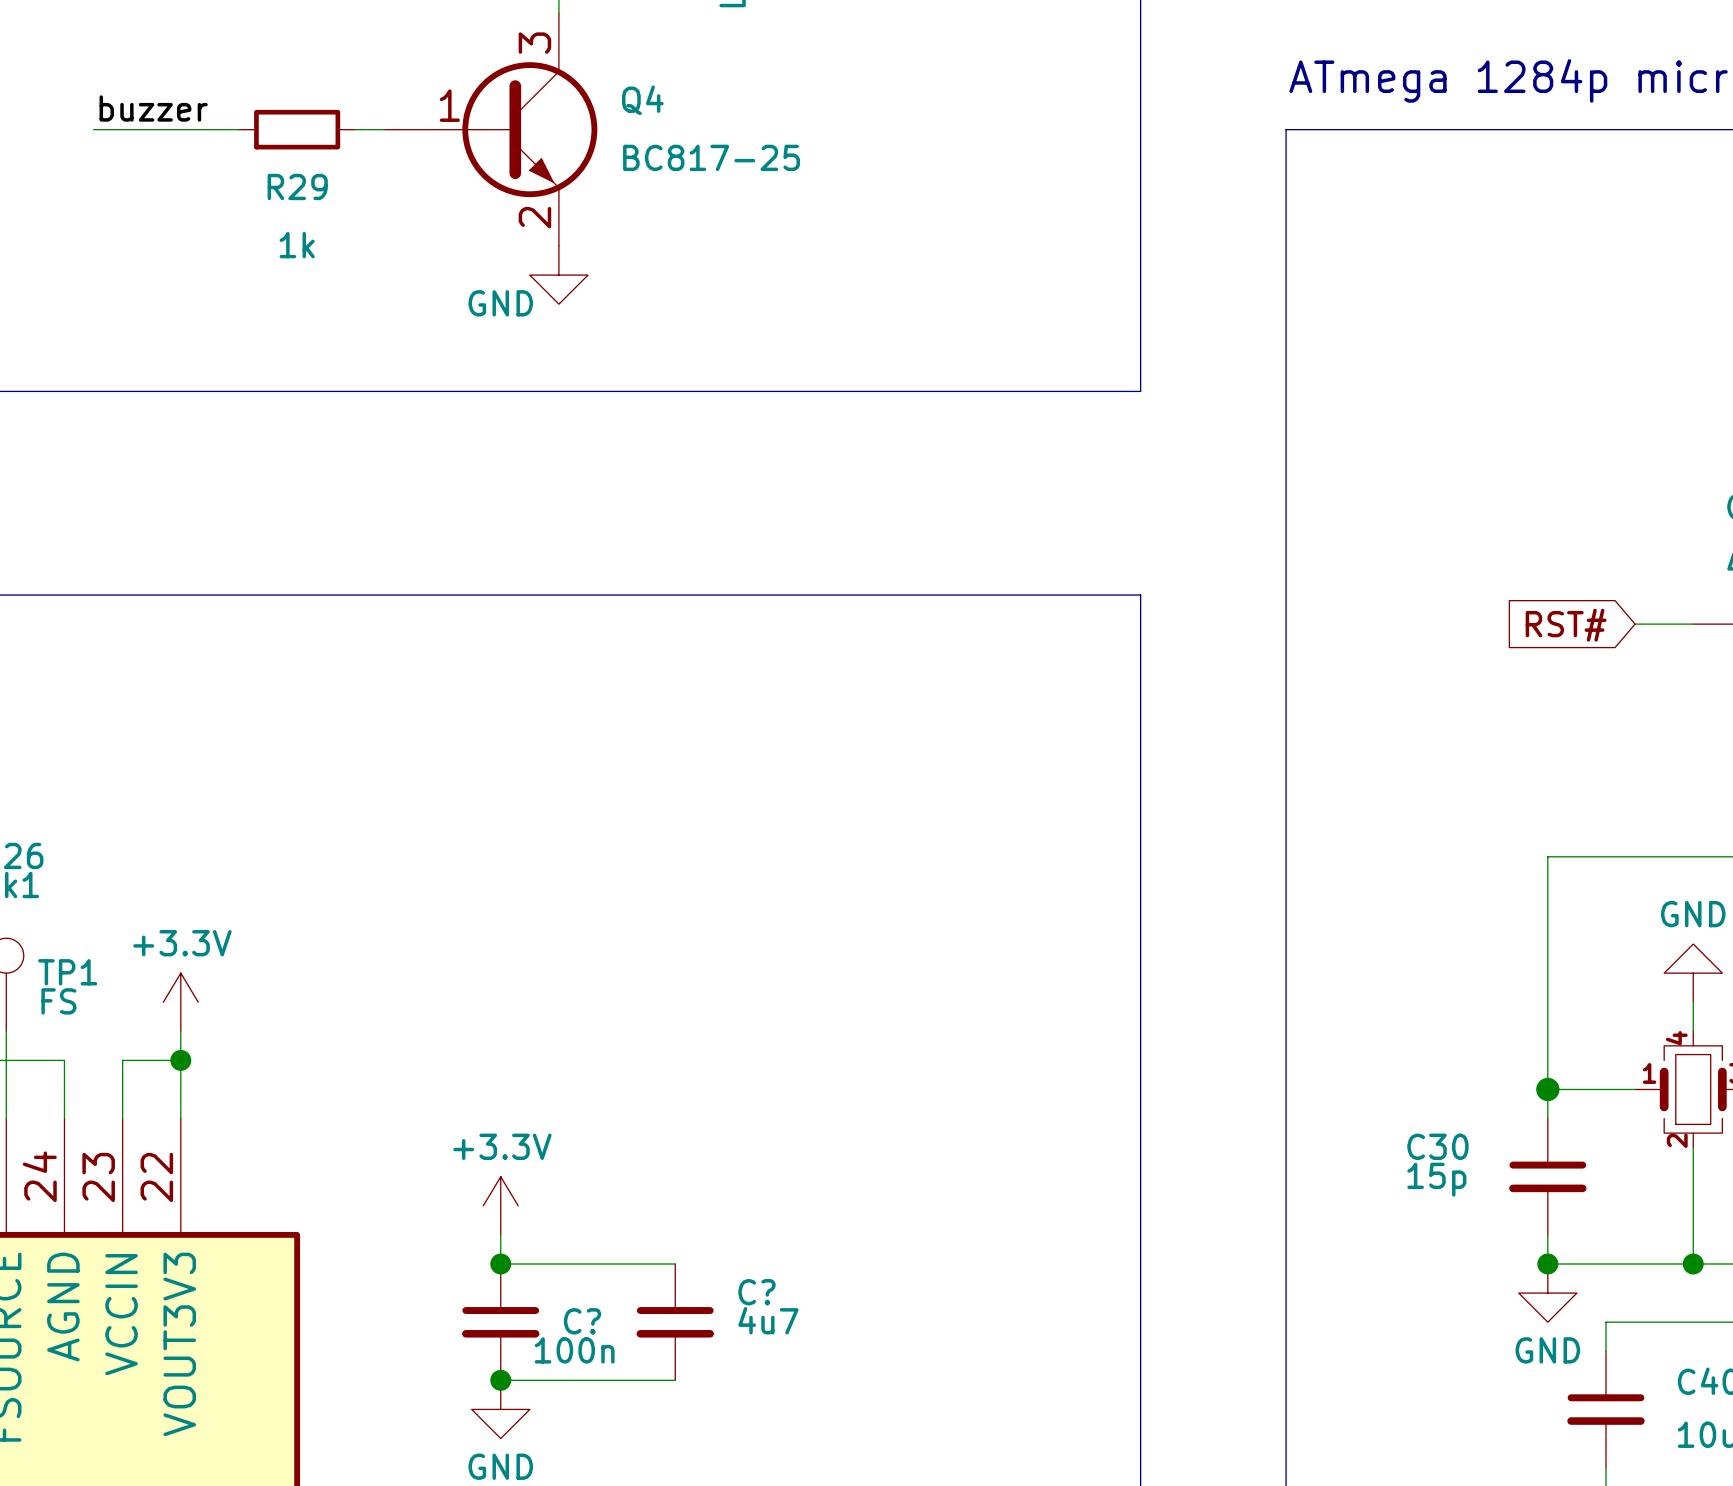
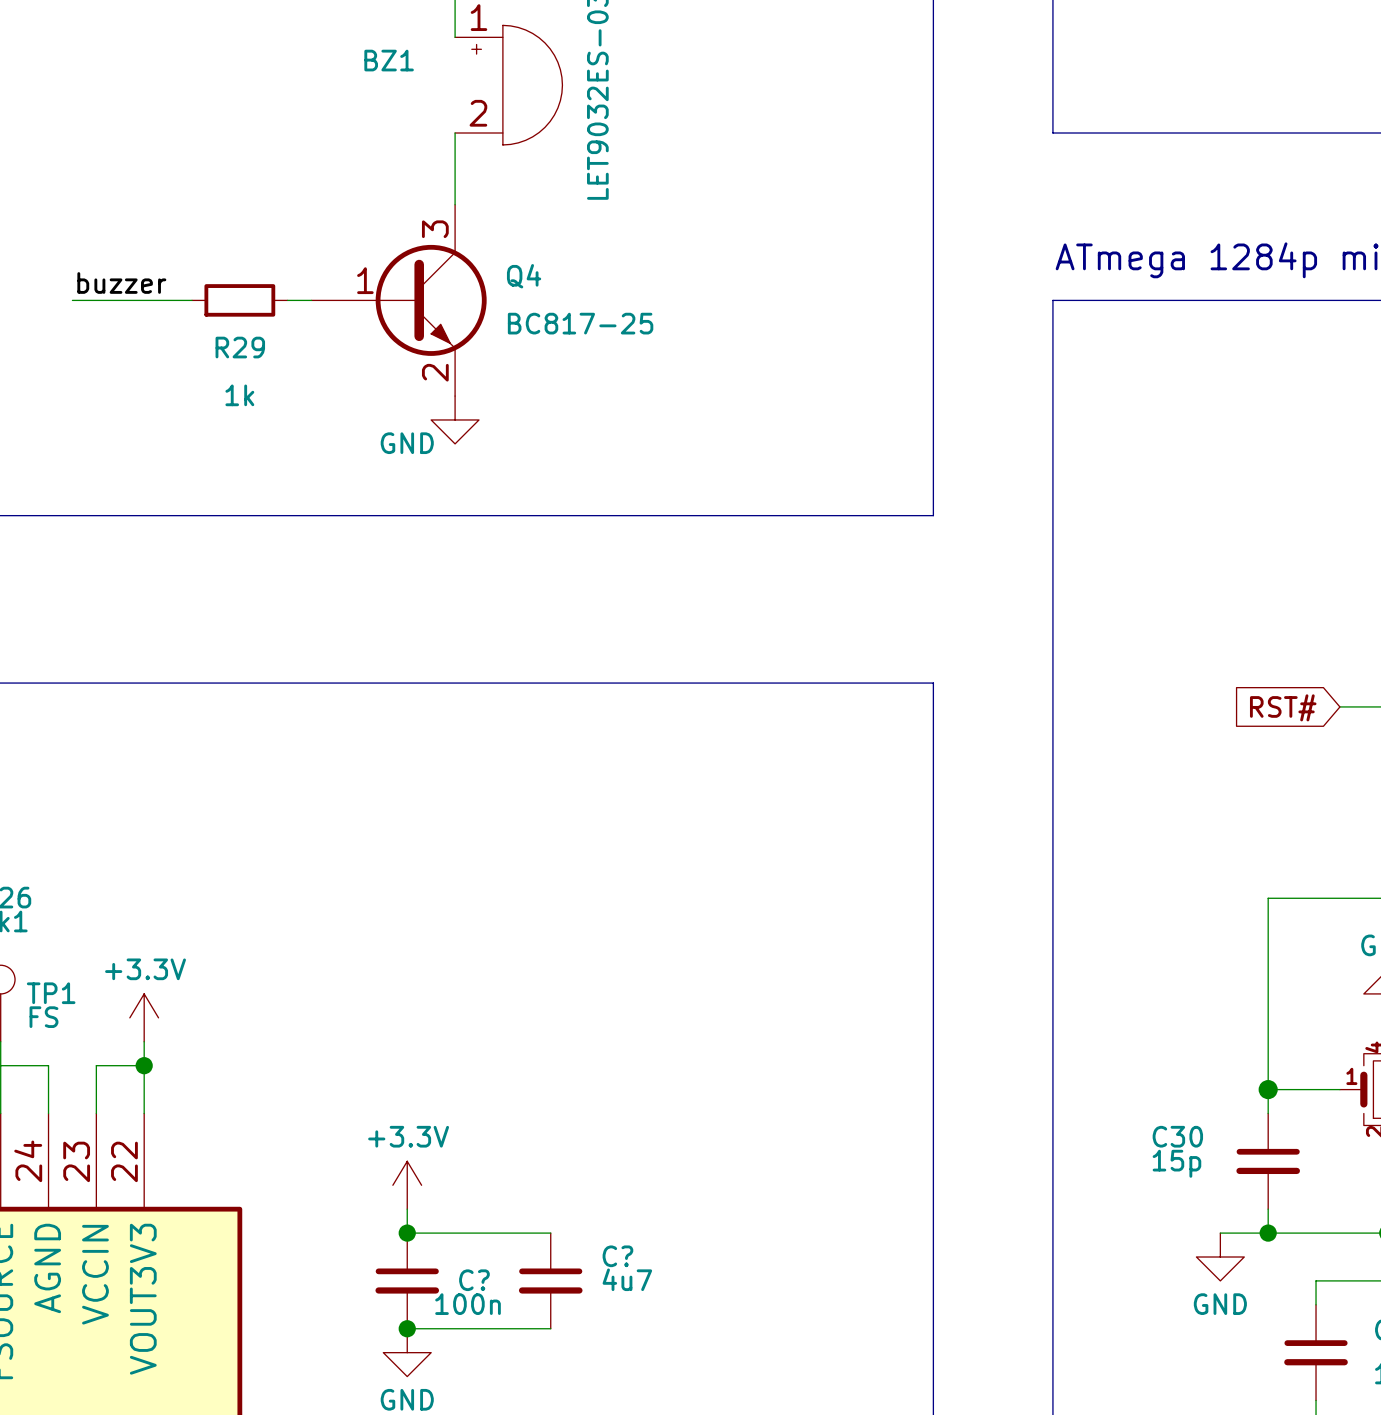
wire: none -> (1220, 1233) (1268, 1233)
power symbol position: GND (1547, 1293) -> GND (1220, 1257)

